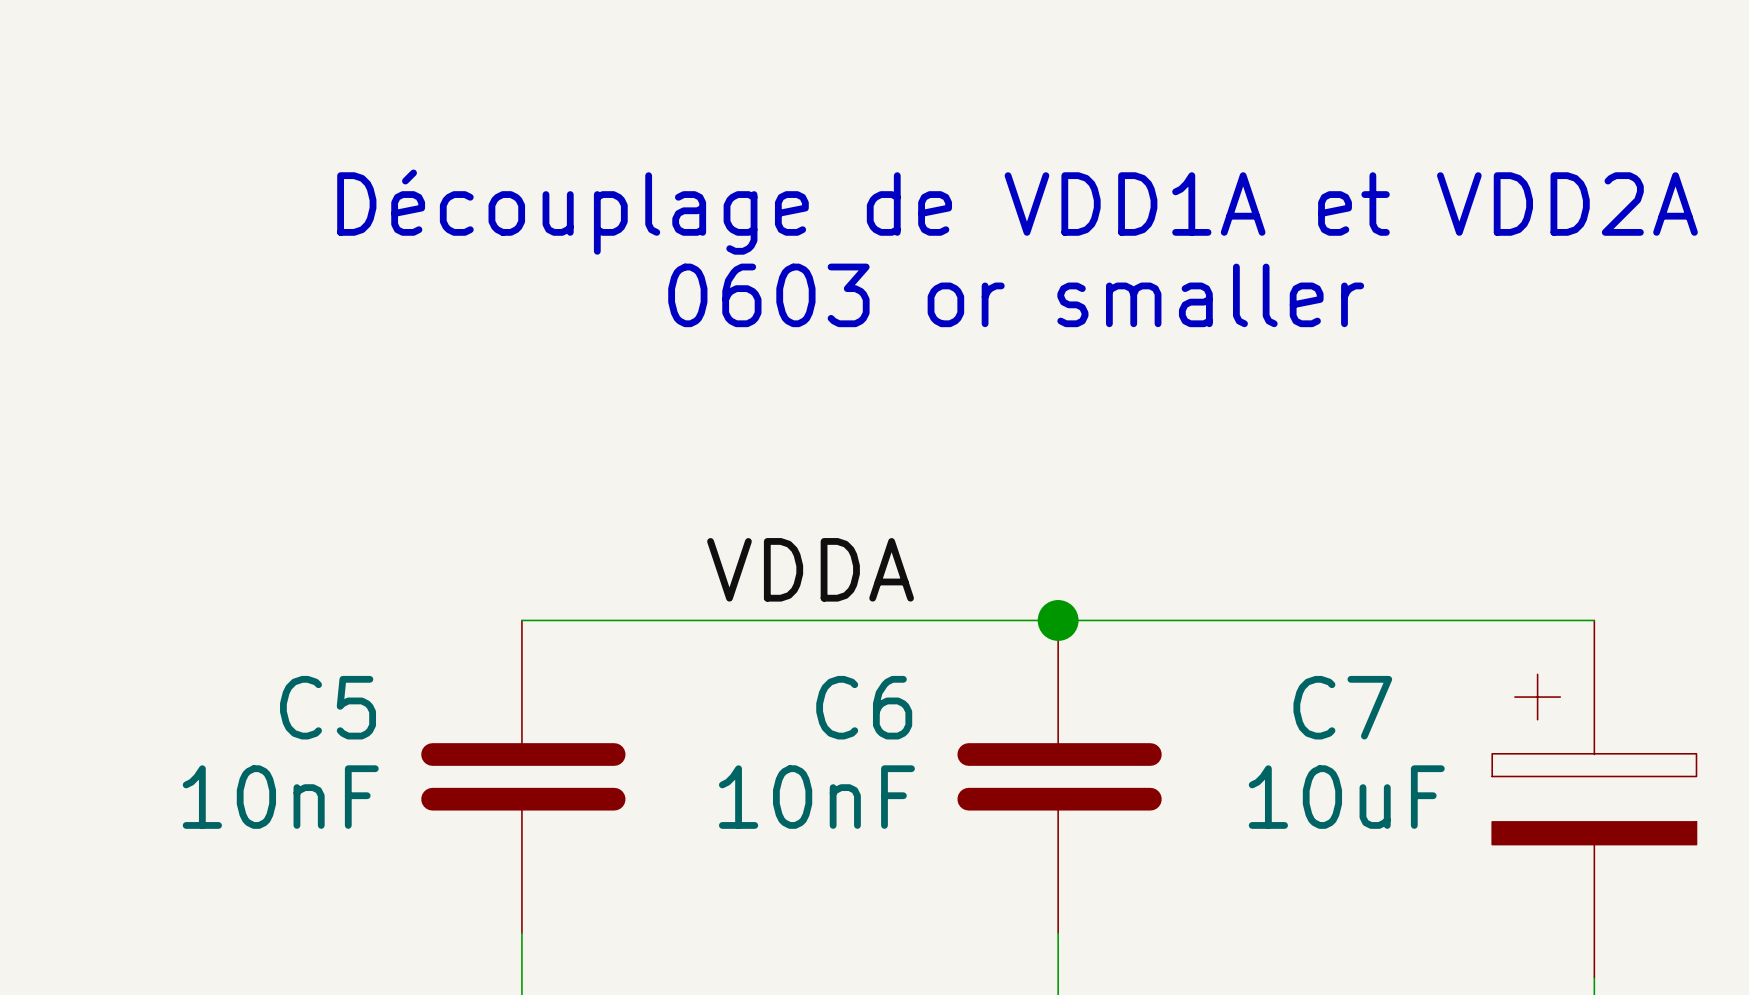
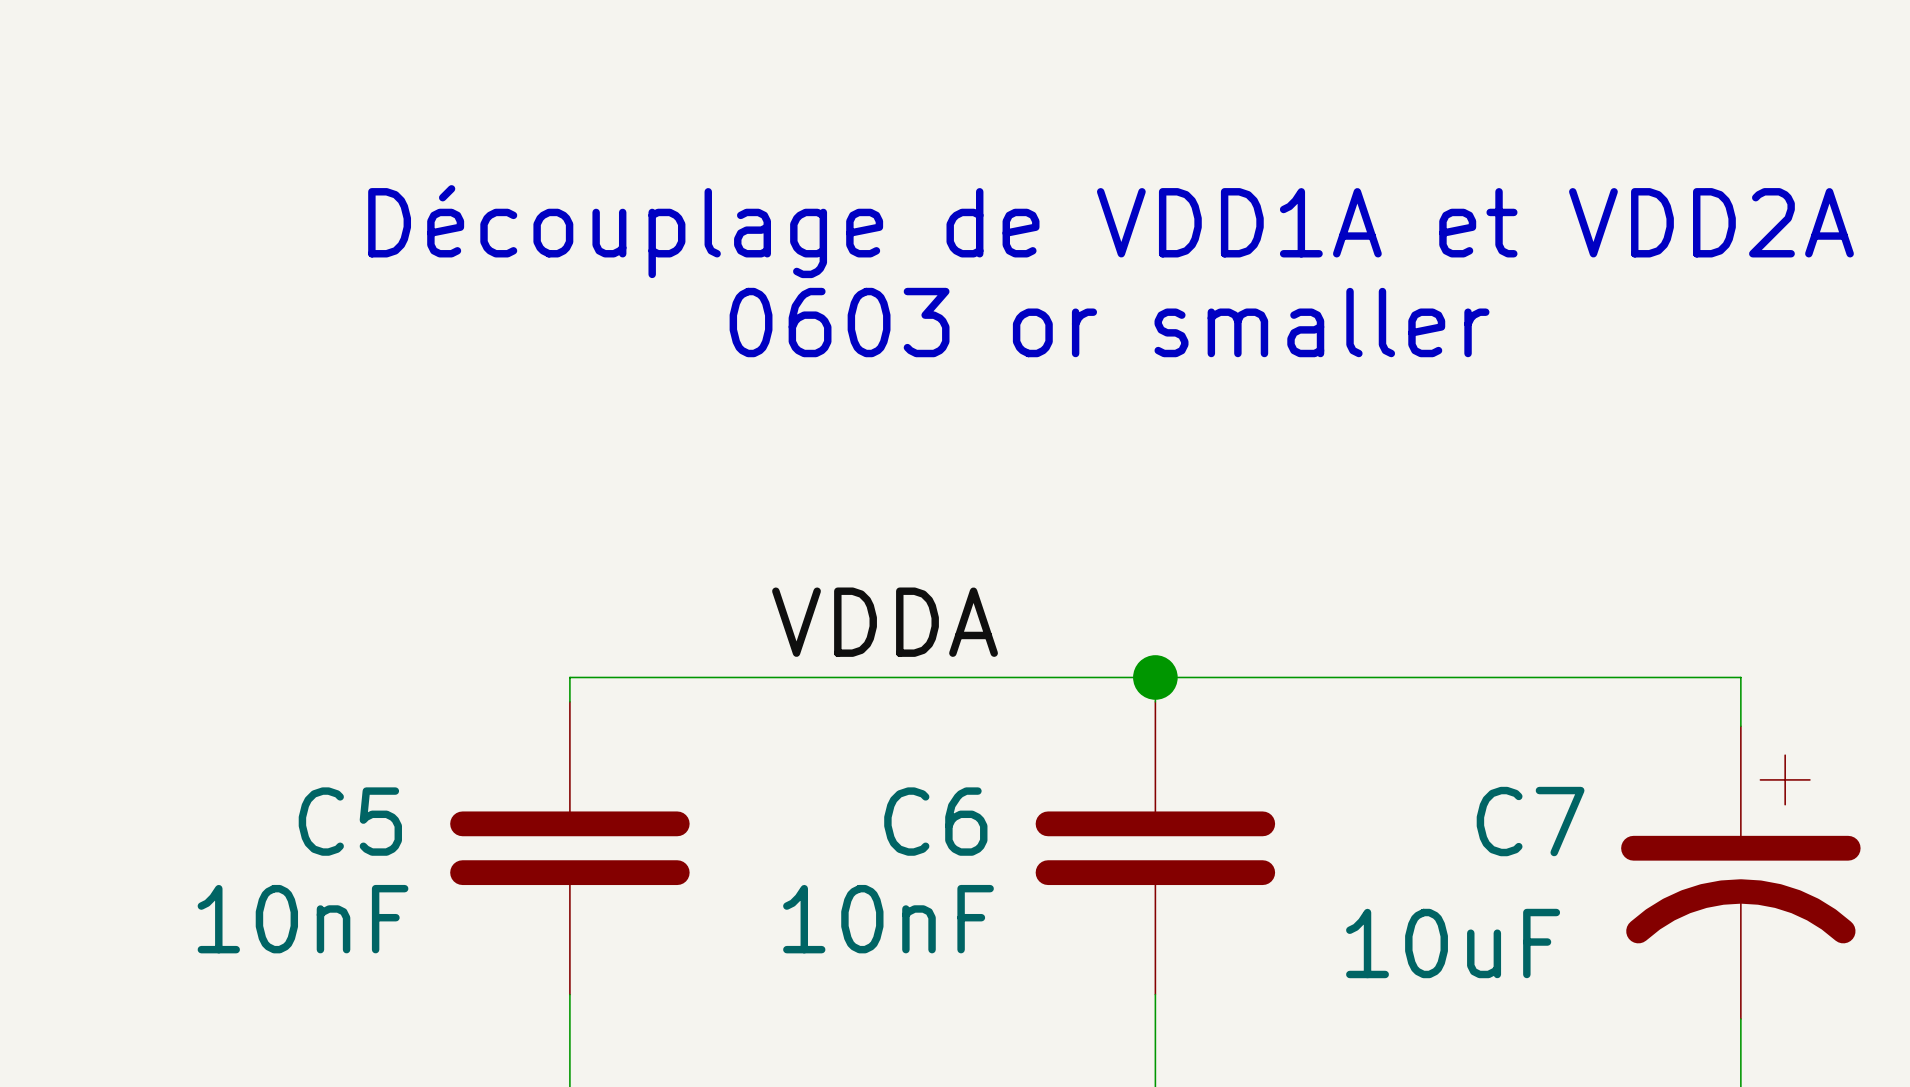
C5 symbol: [421, 620, 626, 934] -> [450, 701, 690, 995]
C6 symbol: [957, 620, 1162, 934] -> [1035, 701, 1276, 995]
C7 symbol: [1492, 620, 1697, 978] -> [1621, 726, 1861, 1020]
C5 name position: C5 (328, 707) -> C5 (350, 821)
C6 name position: C6 (864, 707) -> C6 (935, 821)
C5 value position: 10nF (280, 797) -> 10nF (303, 919)
C6 value position: 10nF (816, 797) -> 10nF (888, 919)

